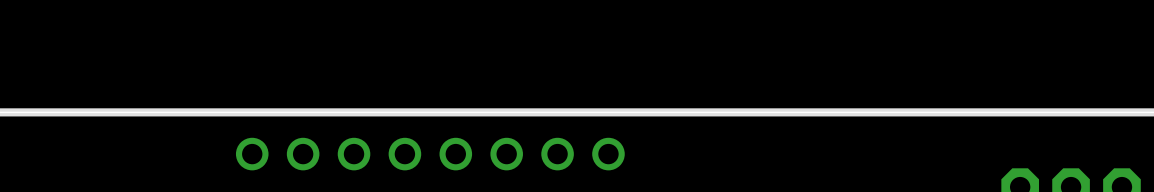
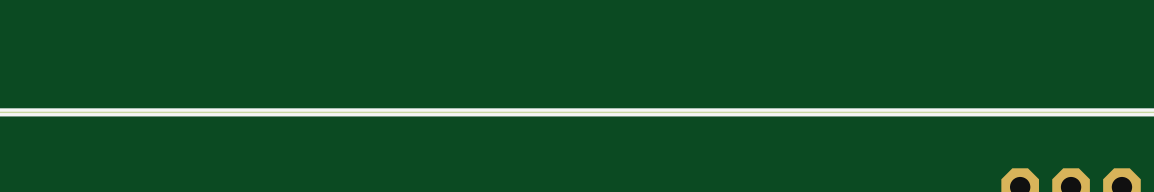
part: (430, 154) -> none

